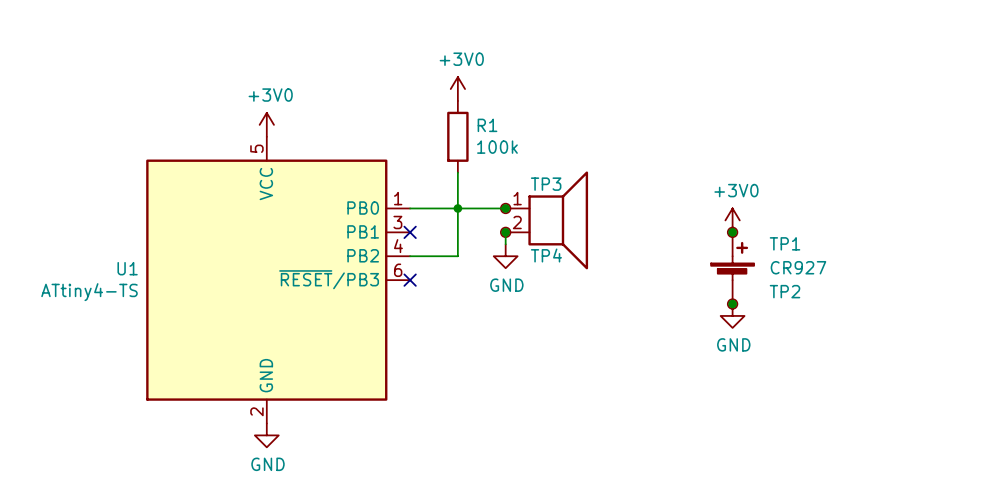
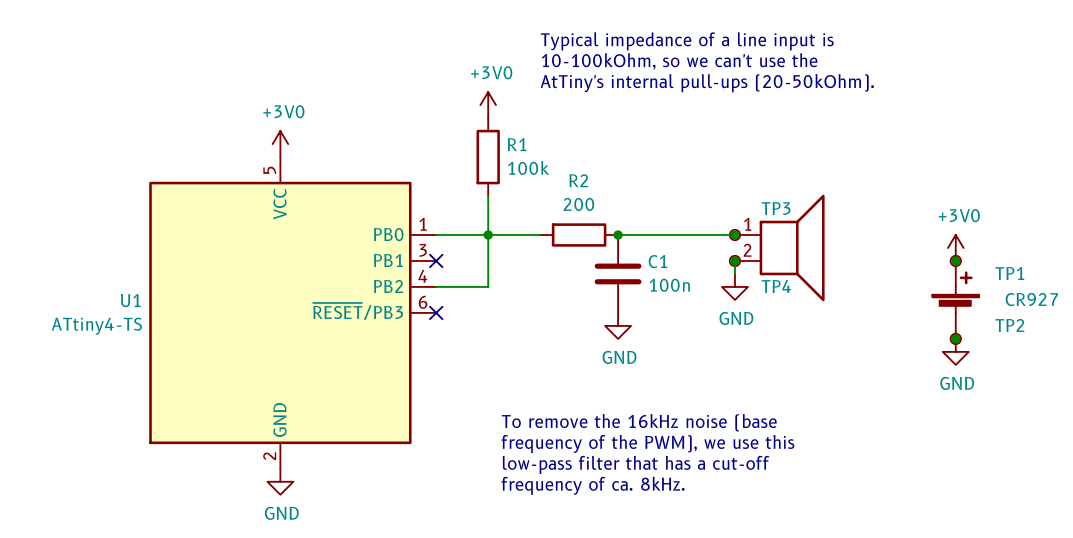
text: none -> Typical impedance of a line input is (687, 41)
text: none -> 10-100kOhm, so we can't use the (679, 61)
text: none -> AtTiny's internal pull-ups (20-50kOhm). (707, 83)
power symbol text: +3V0 (736, 190) -> none
TP3 position: (505, 208) -> (734, 235)
junction: (505, 208) -> none
R2: none -> 200 (579, 235)
wire: none -> (618, 235) (734, 235)
junction: none -> (618, 235)
junction: none -> (734, 235)
power symbol shape: [725, 208, 740, 233] -> [734, 194, 825, 302]
power symbol: (546, 220) -> none
power symbol: none -> +3V0 (955, 247)
wire: (505, 232) (505, 244) -> (734, 260) (734, 273)
TP4 position: (505, 232) -> (734, 260)
junction: (505, 232) -> none
junction: none -> (734, 260)
TP1 position: (732, 232) -> (955, 260)
junction: (732, 232) -> none
junction: none -> (955, 260)
C1: none -> 100n (618, 273)
power symbol: GND (505, 256) -> none
power symbol position: CR927 (732, 268) -> CR927 (955, 299)
power symbol: none -> GND (618, 325)
TP2 position: (732, 304) -> (955, 338)
junction: (732, 304) -> none
junction: none -> (955, 338)
power symbol position: GND (732, 315) -> GND (734, 286)
power symbol: none -> GND (955, 351)
text: none -> To remove the 16kHz noise (base (639, 422)
text: none -> frequency of the PWM), we use this (647, 444)
text: none -> low-pass filter that has a cut-off (636, 464)
text: none -> frequency of ca. 8kHz. (593, 485)

